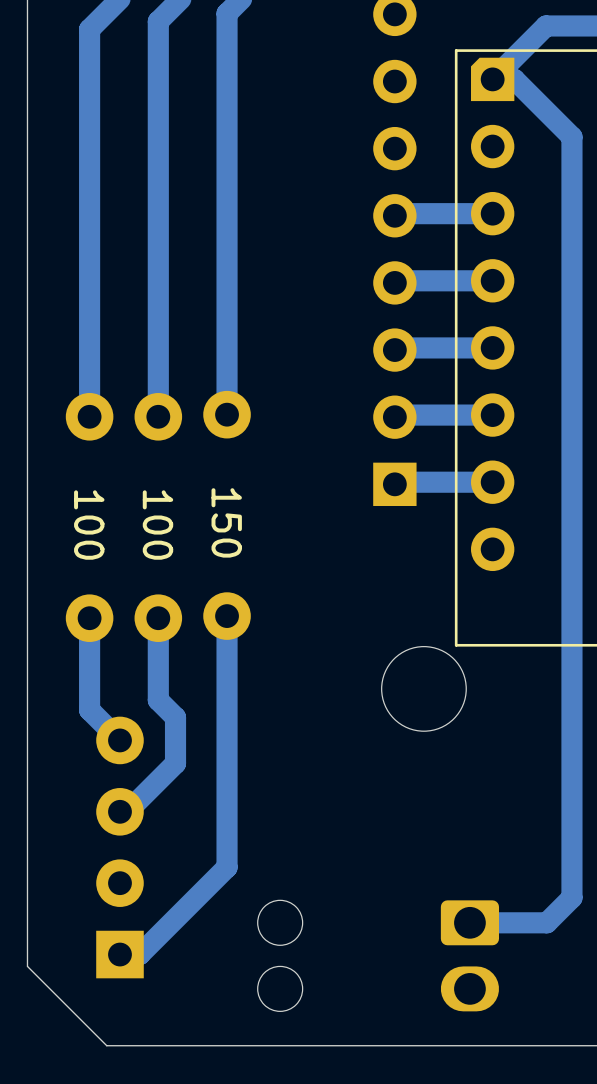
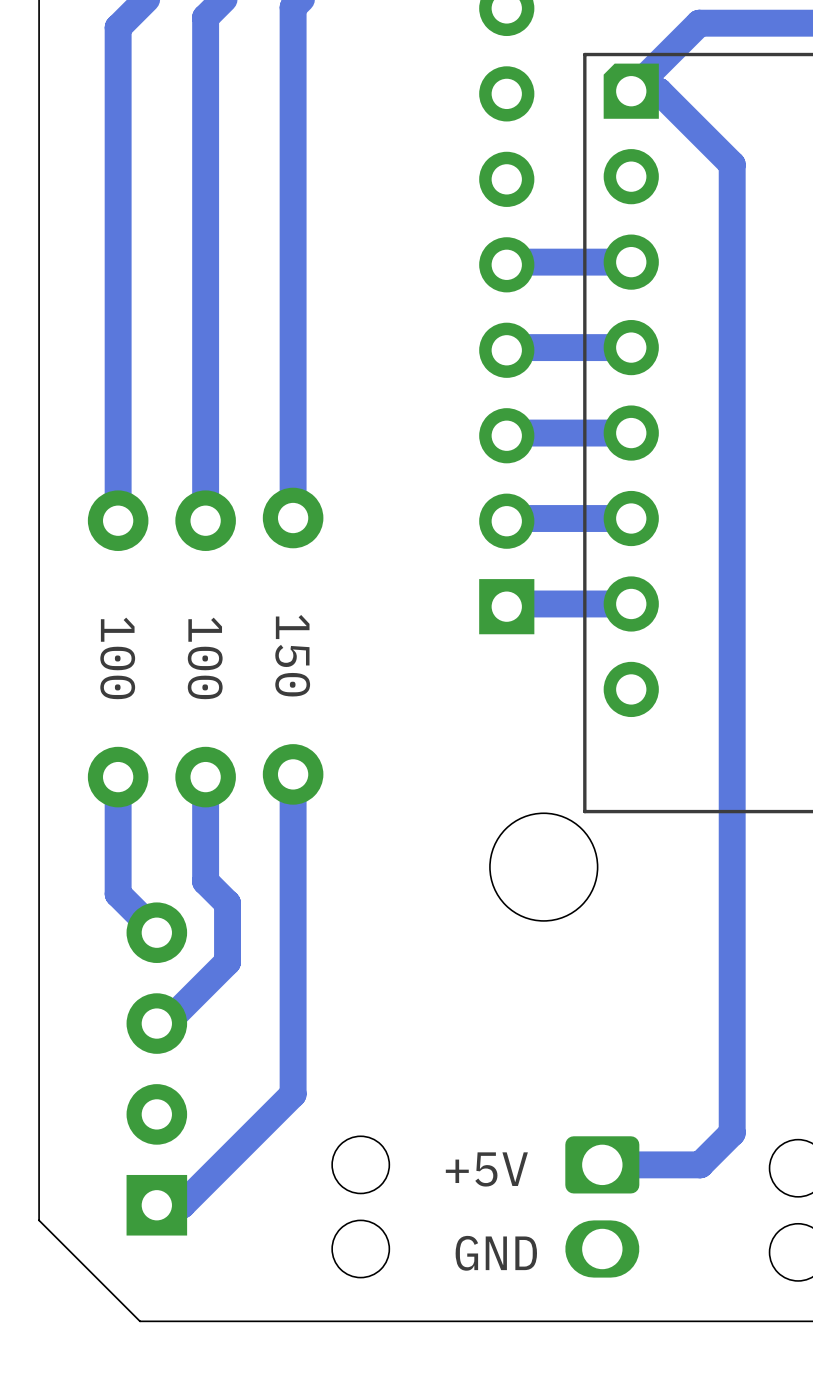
text: none -> +5V (486, 1169)
text: none -> GND (496, 1253)

